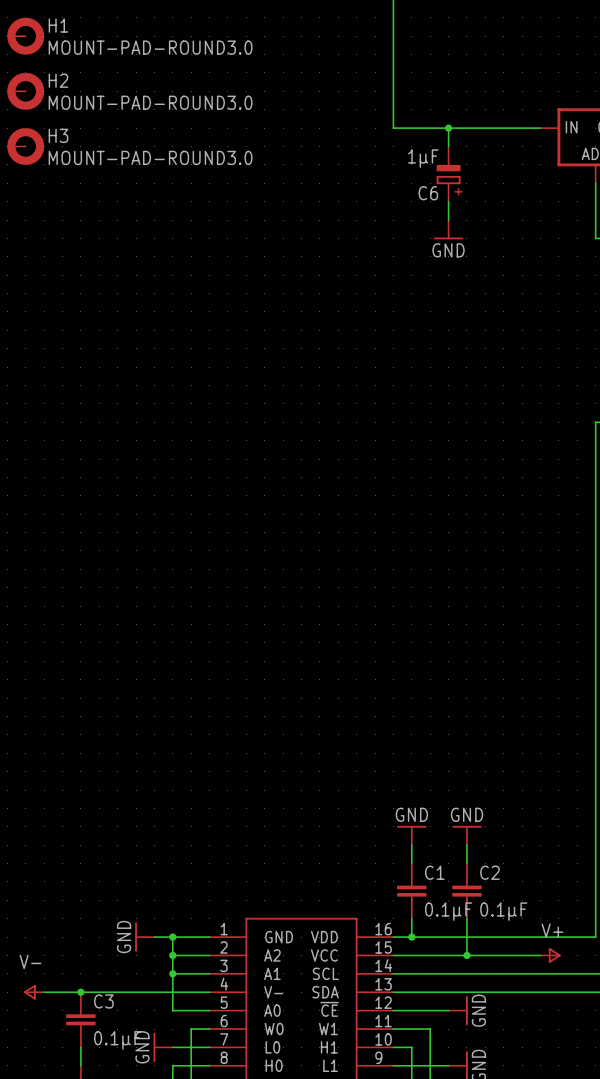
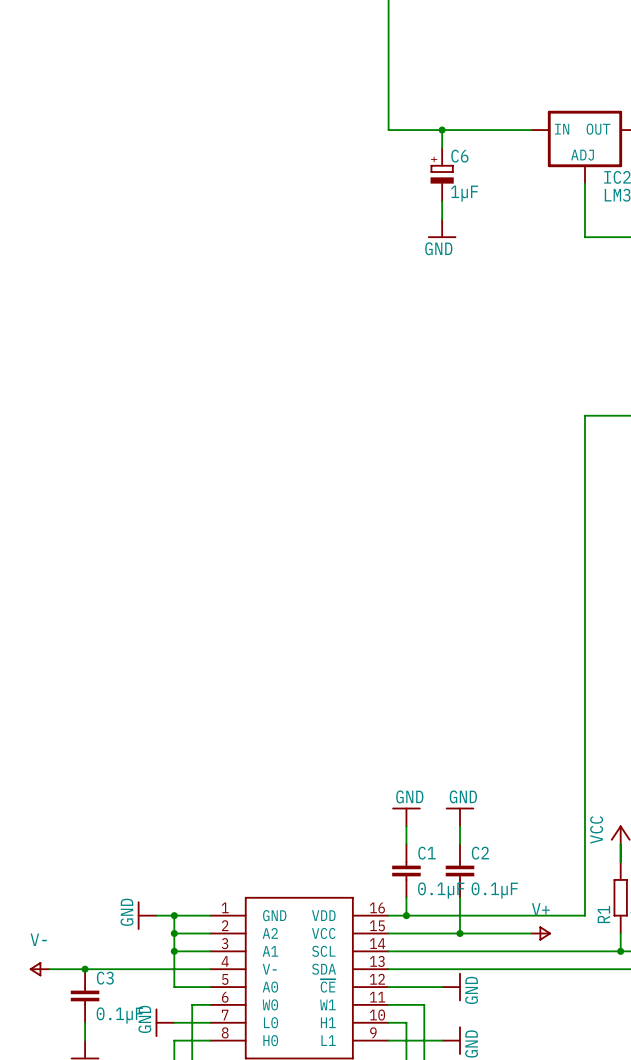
H1: MOUNT-PAD-ROUND3.0 (25, 36) -> none
H2: MOUNT-PAD-ROUND3.0 (25, 91) -> none
H3: MOUNT-PAD-ROUND3.0 (25, 146) -> none
C6 symbol: [436, 146, 461, 202] -> [430, 147, 454, 202]
C6 value position: 1µF (423, 158) -> 1µF (464, 193)
C6 name position: C6 (428, 193) -> C6 (459, 156)

